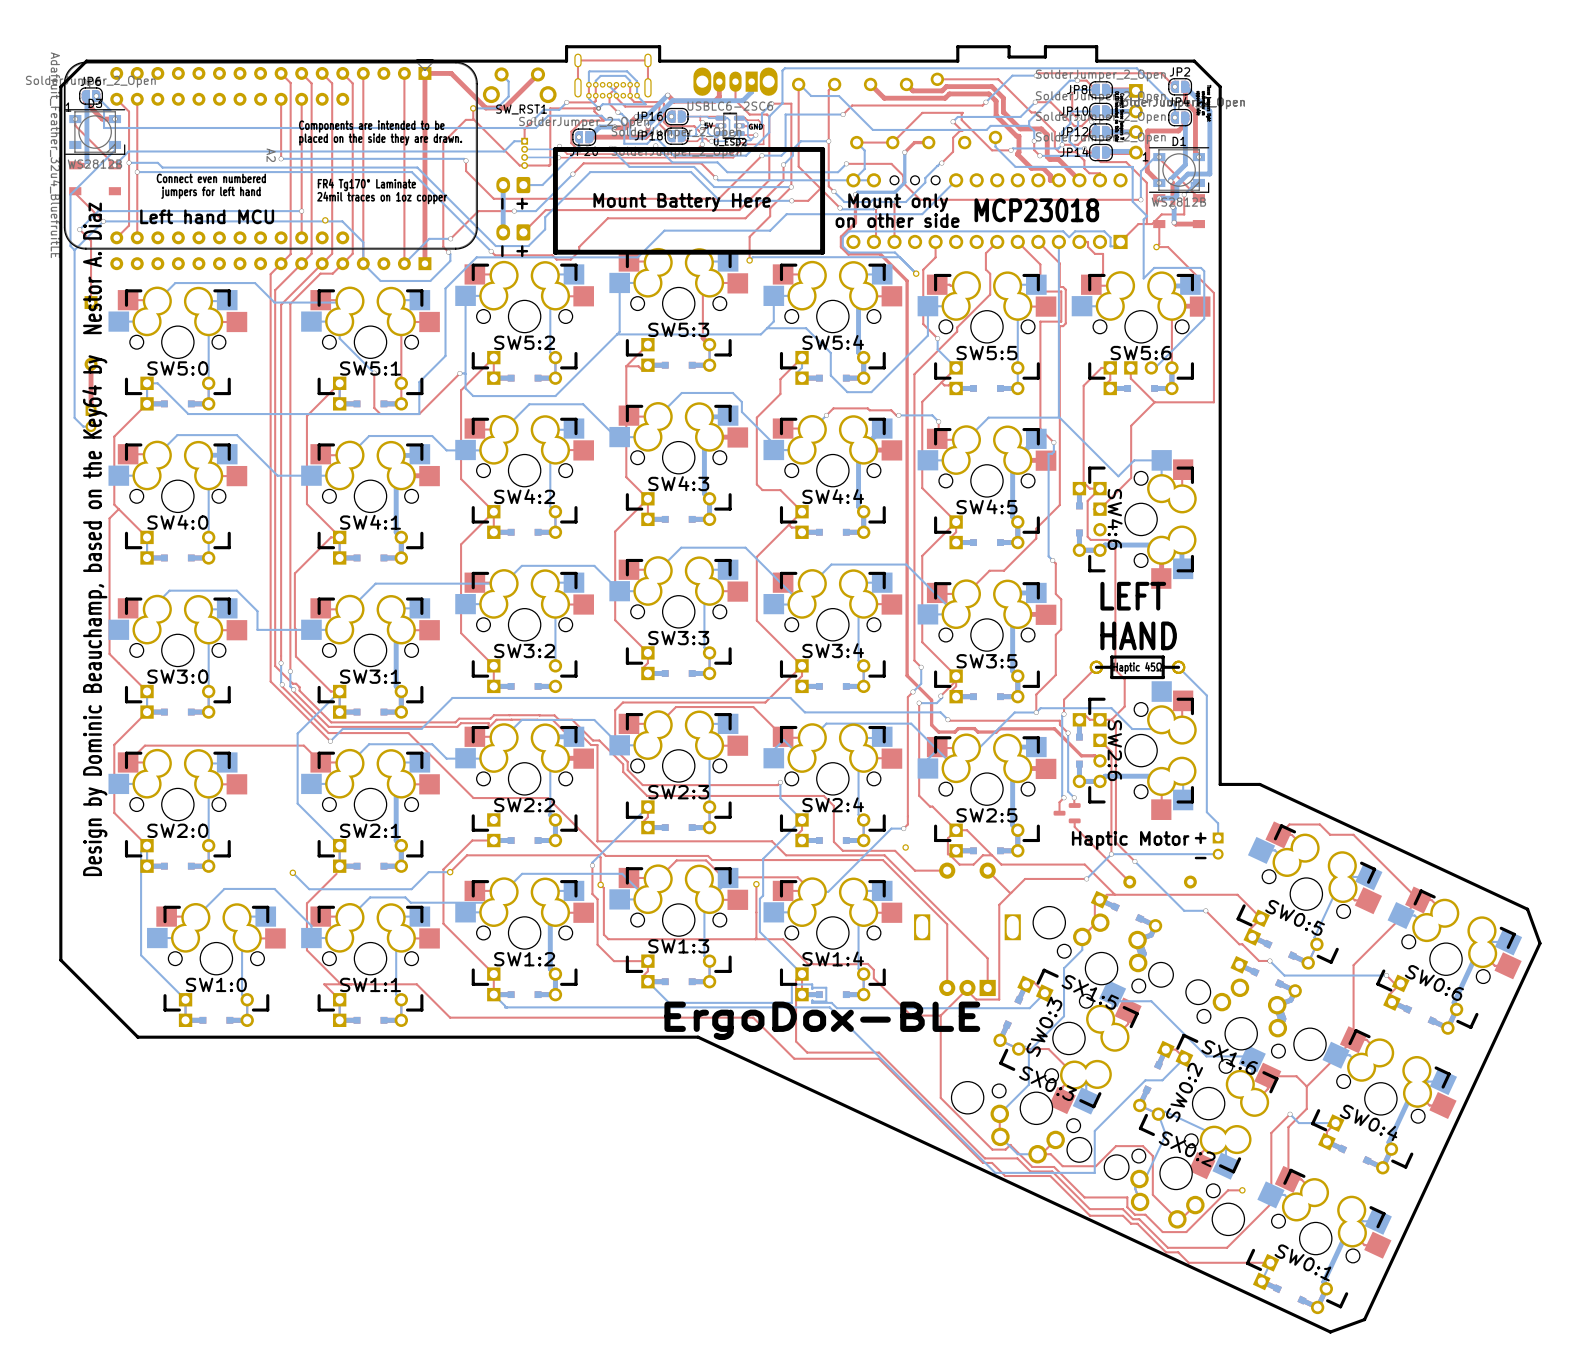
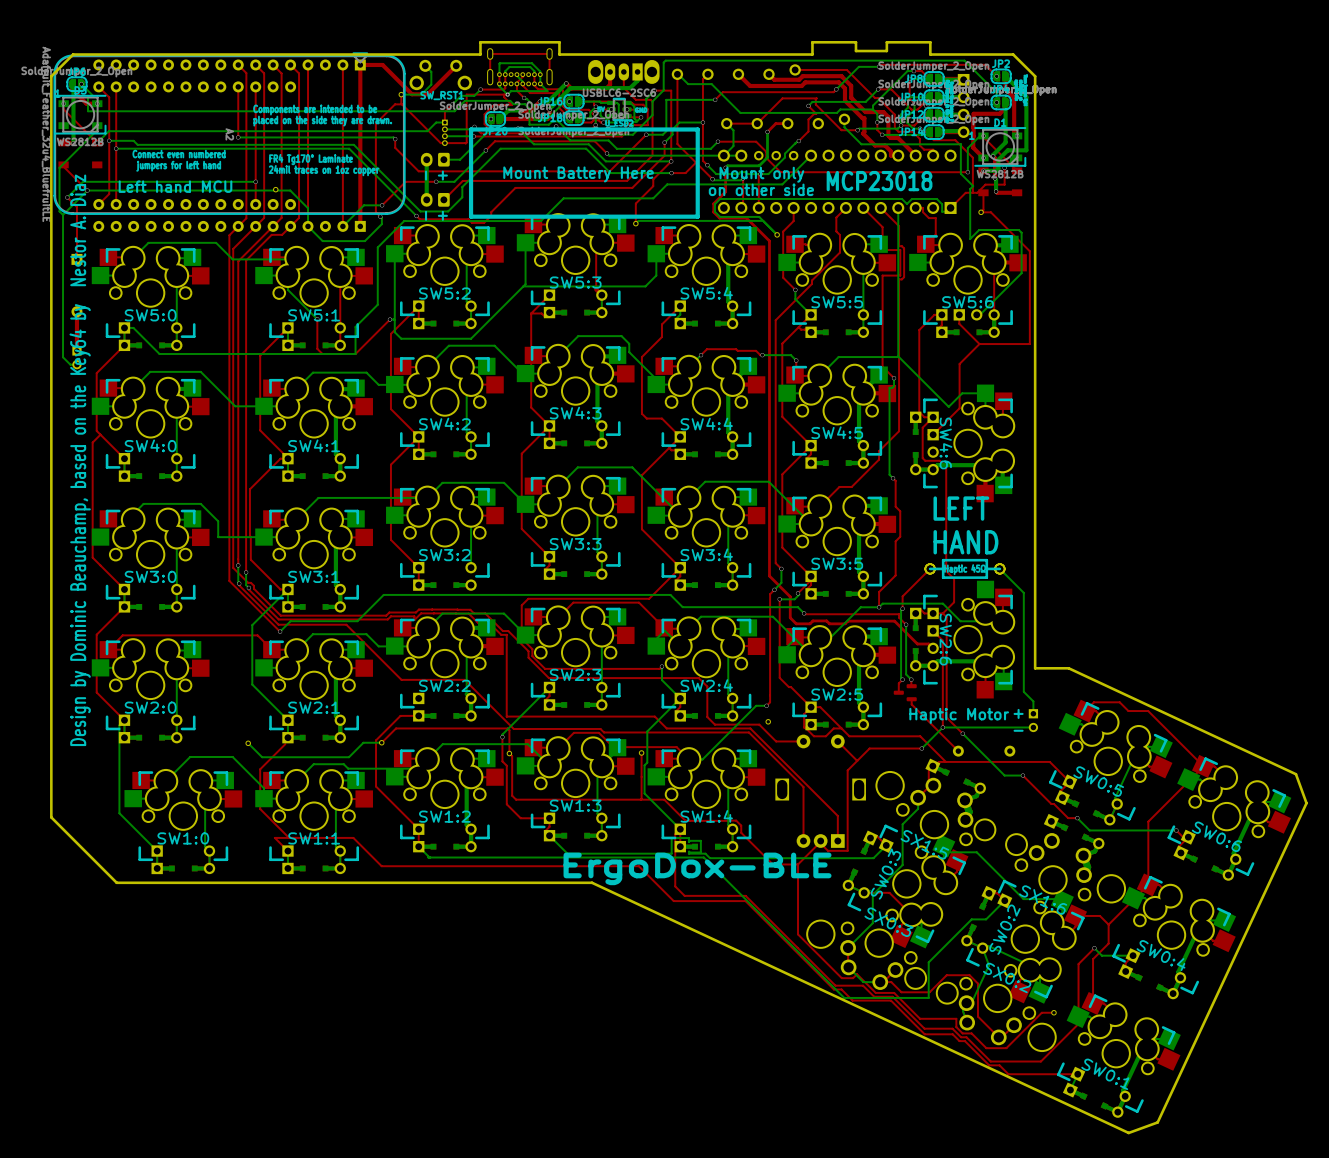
bottom track: (927, 306) (927, 335) (871, 392) (847, 392) (830, 375) (830, 352) (806, 328) (767, 328) -> none

